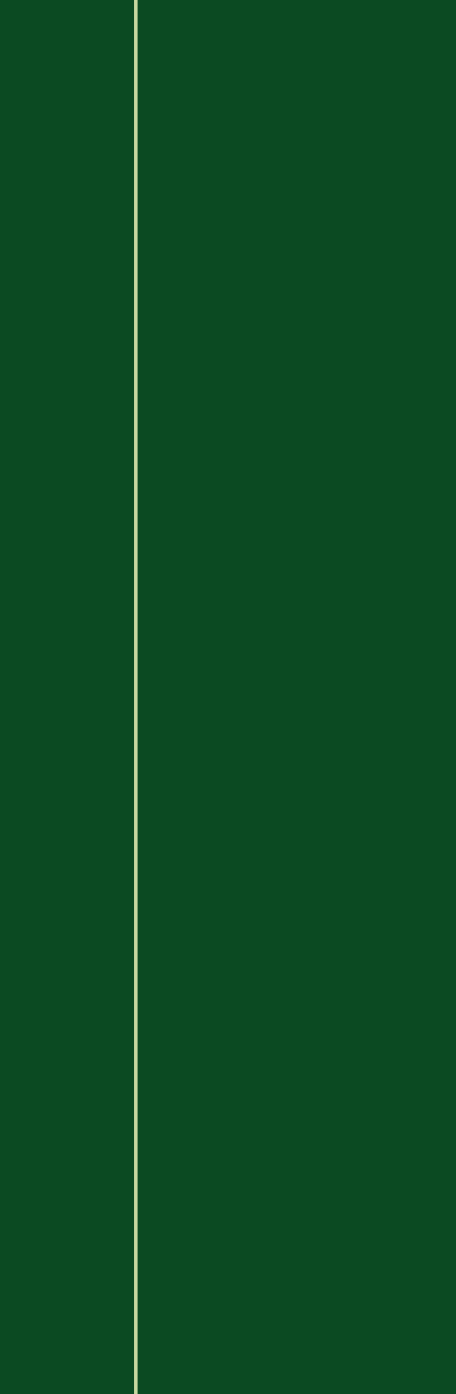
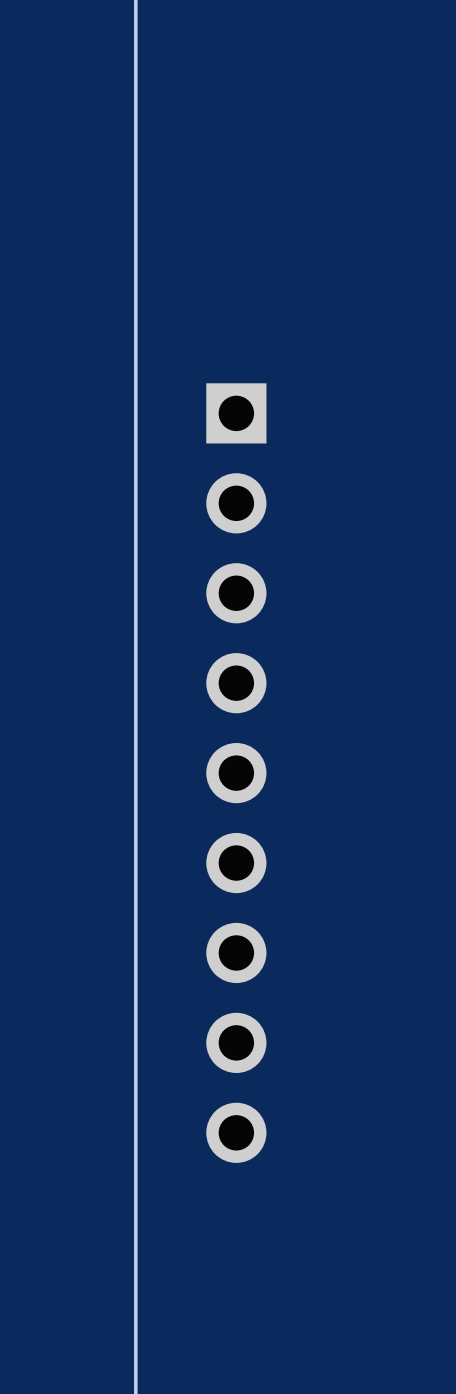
part: none -> (236, 773)

